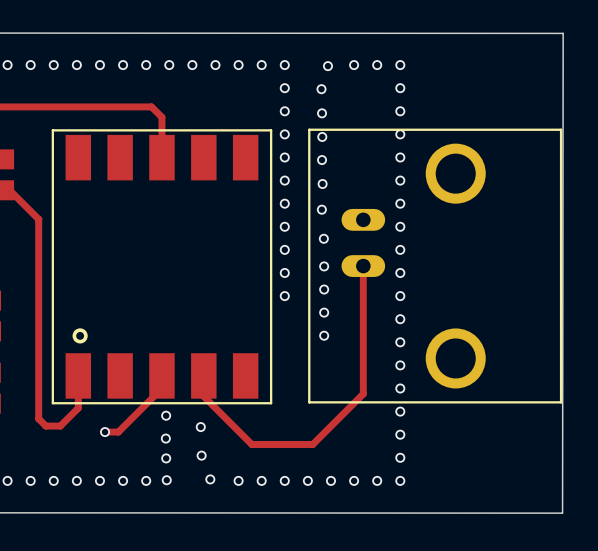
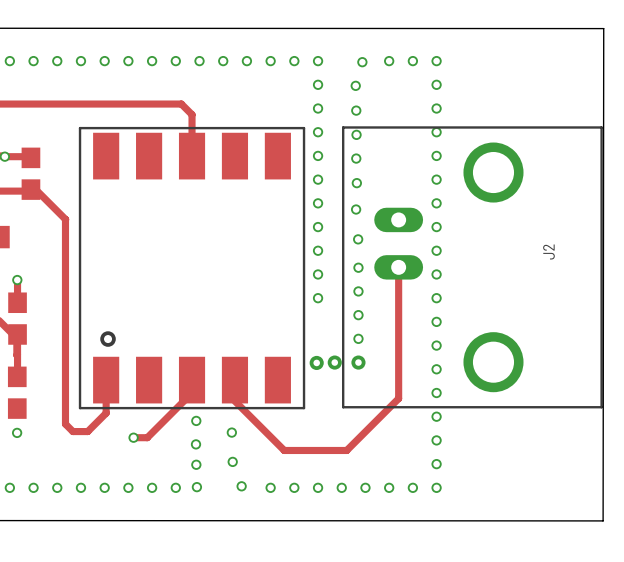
part: (435, 266) -> none
J2: none -> (472, 267)
via: none -> (334, 362)
via: none -> (358, 362)
via: none -> (316, 362)

